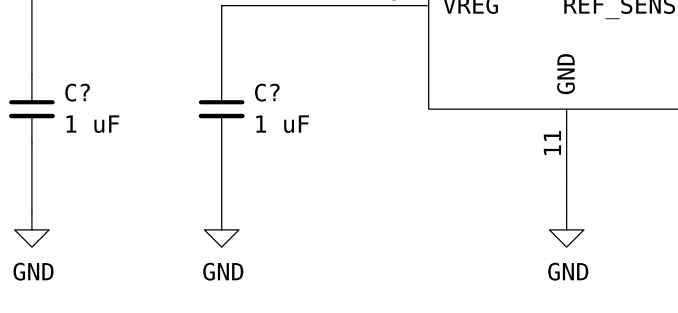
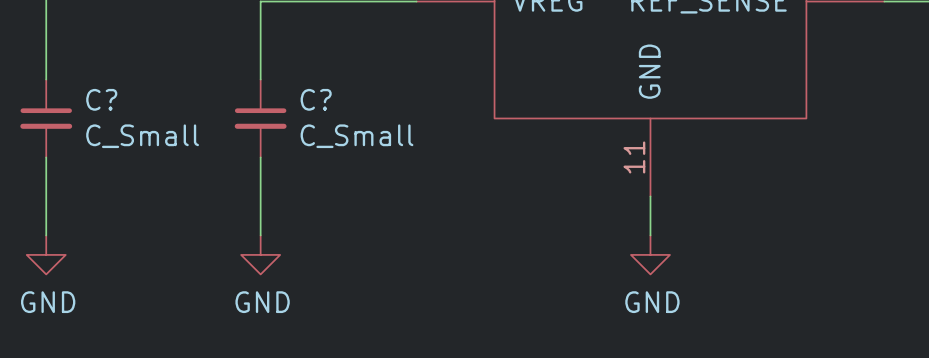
C? value: 1 uF (92, 124) -> C_Small (142, 136)
C? value: 1 uF (282, 124) -> C_Small (356, 136)

